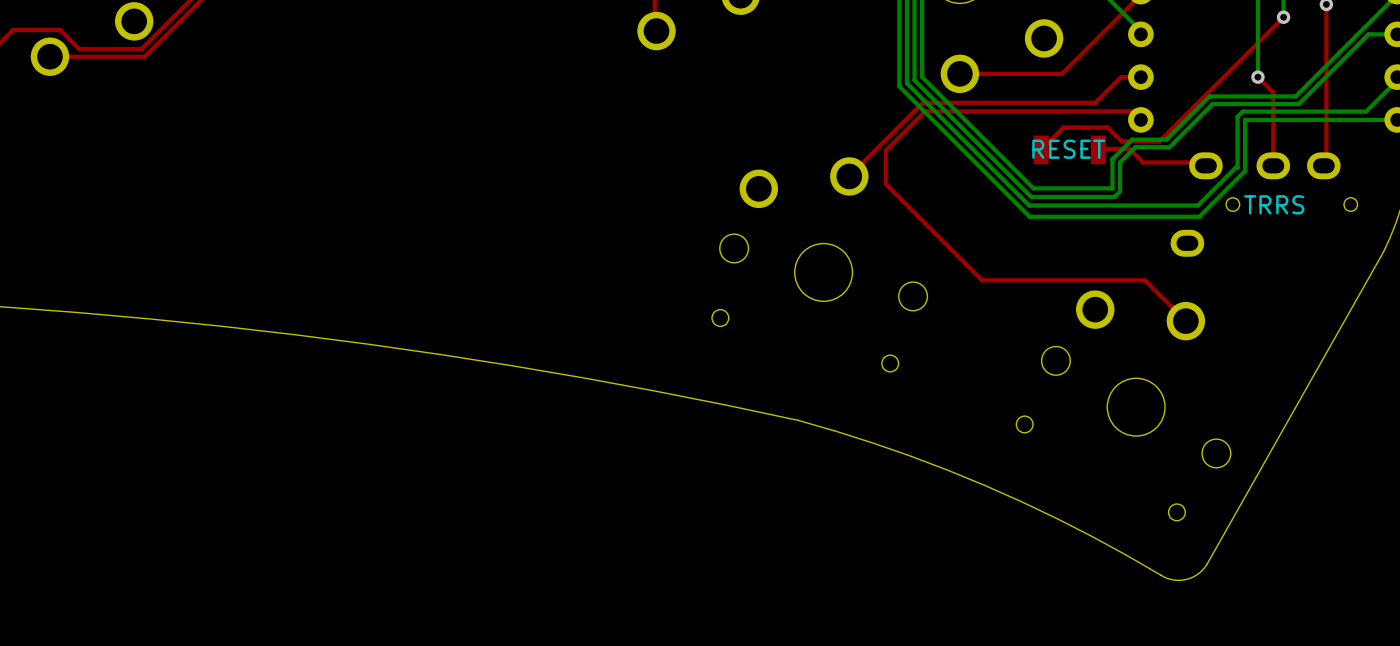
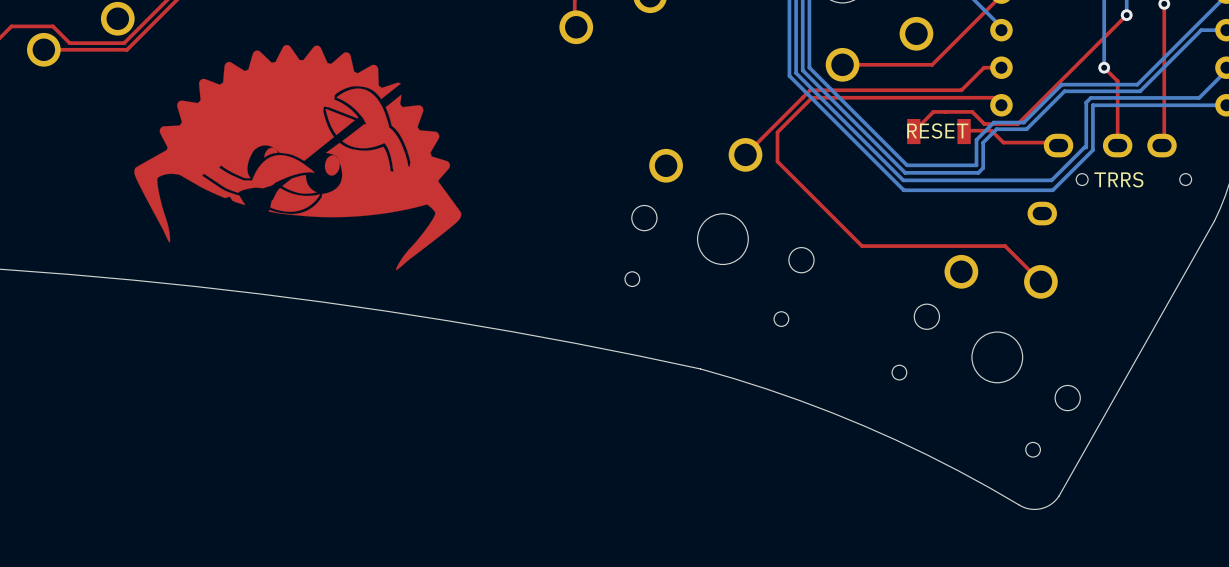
drawing: none -> [134, 44, 462, 271]

